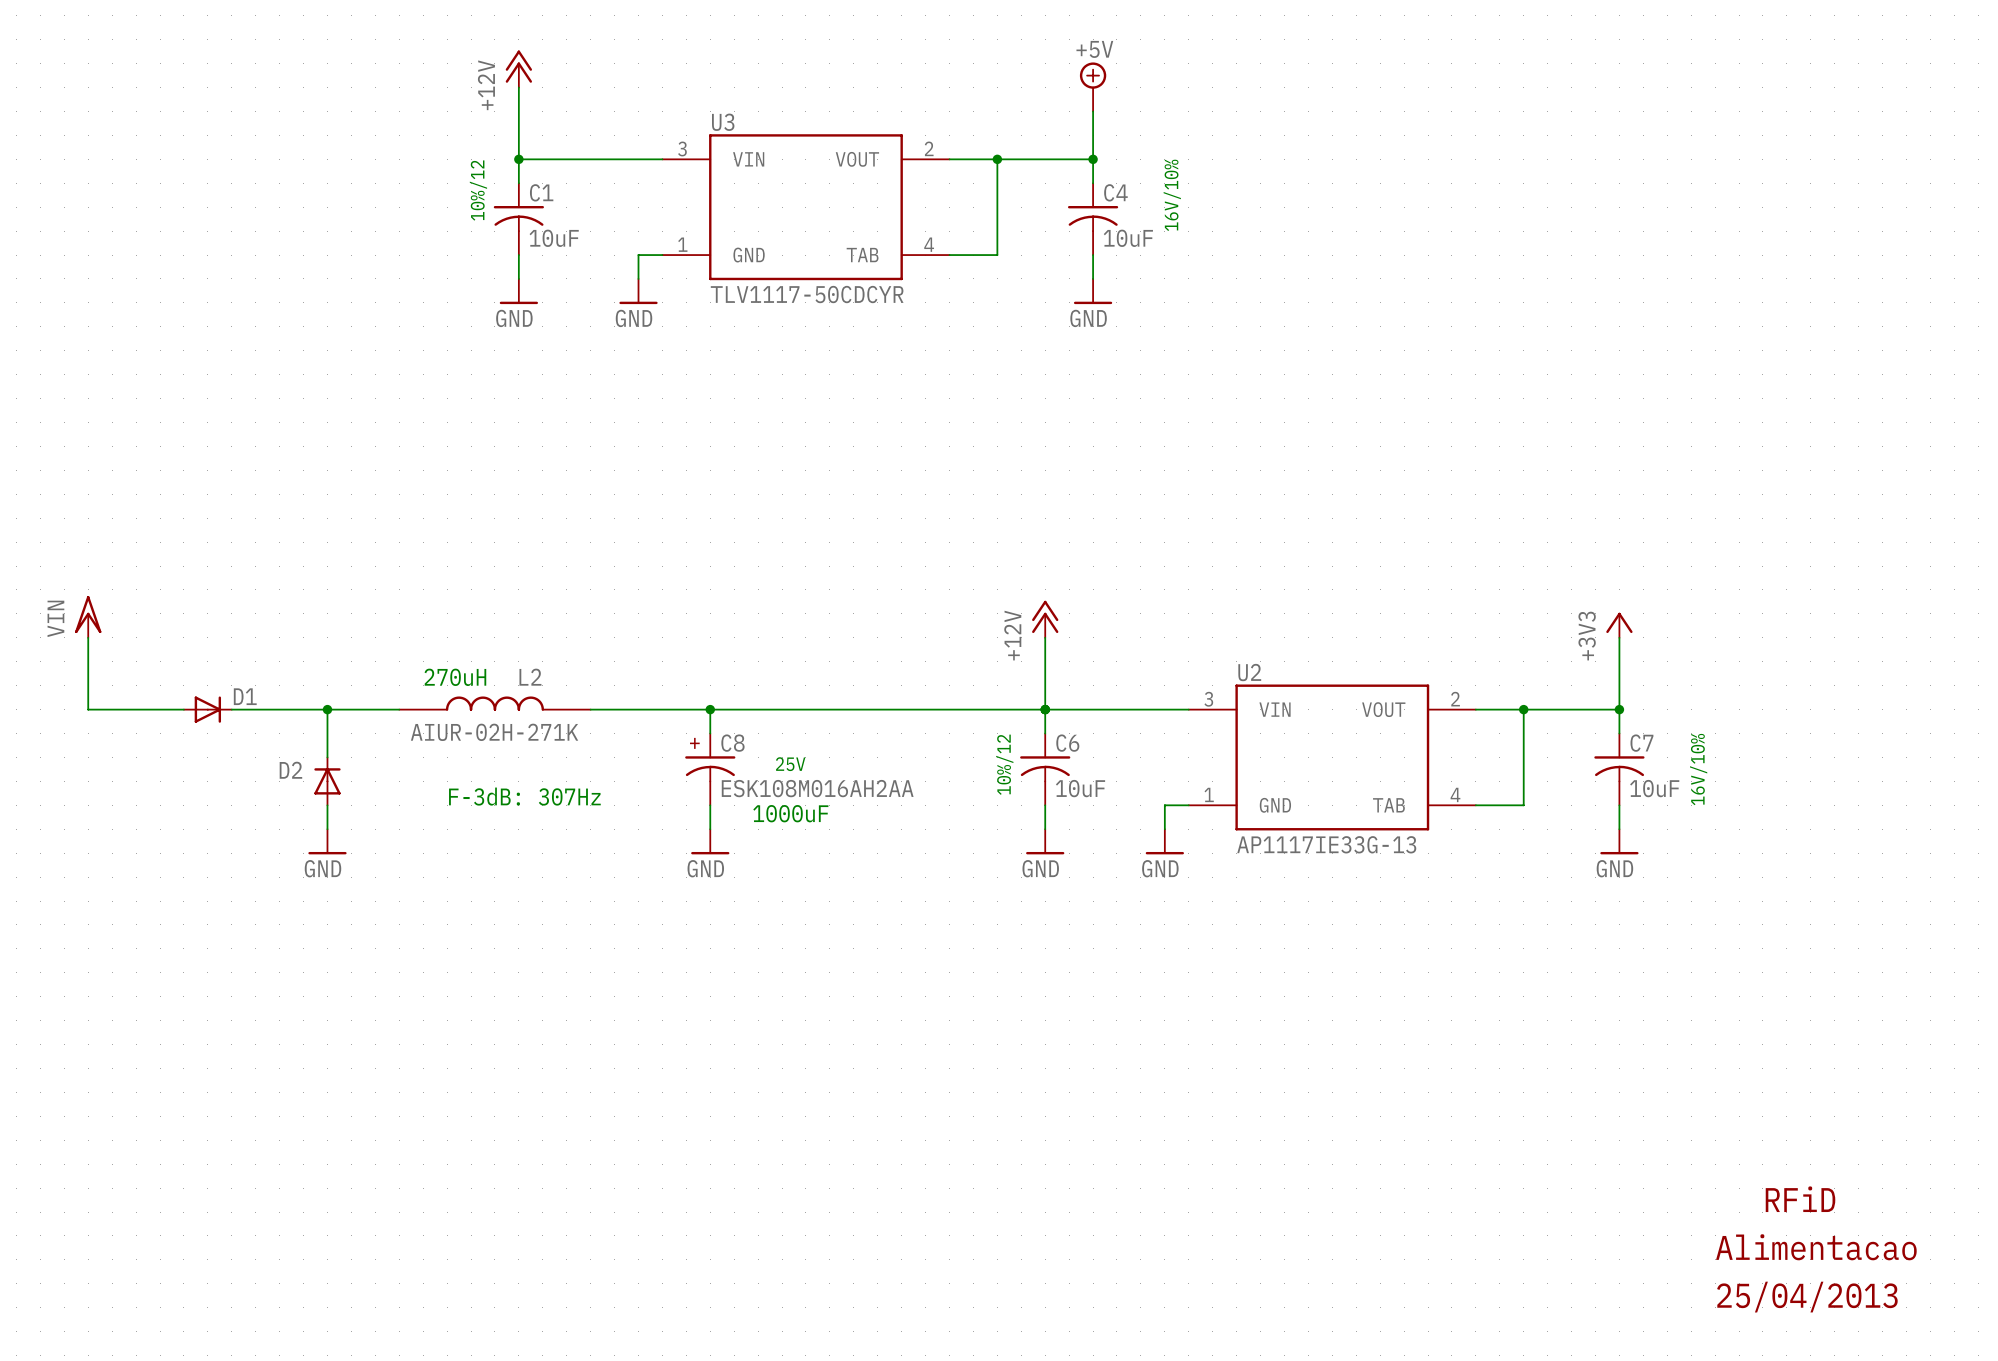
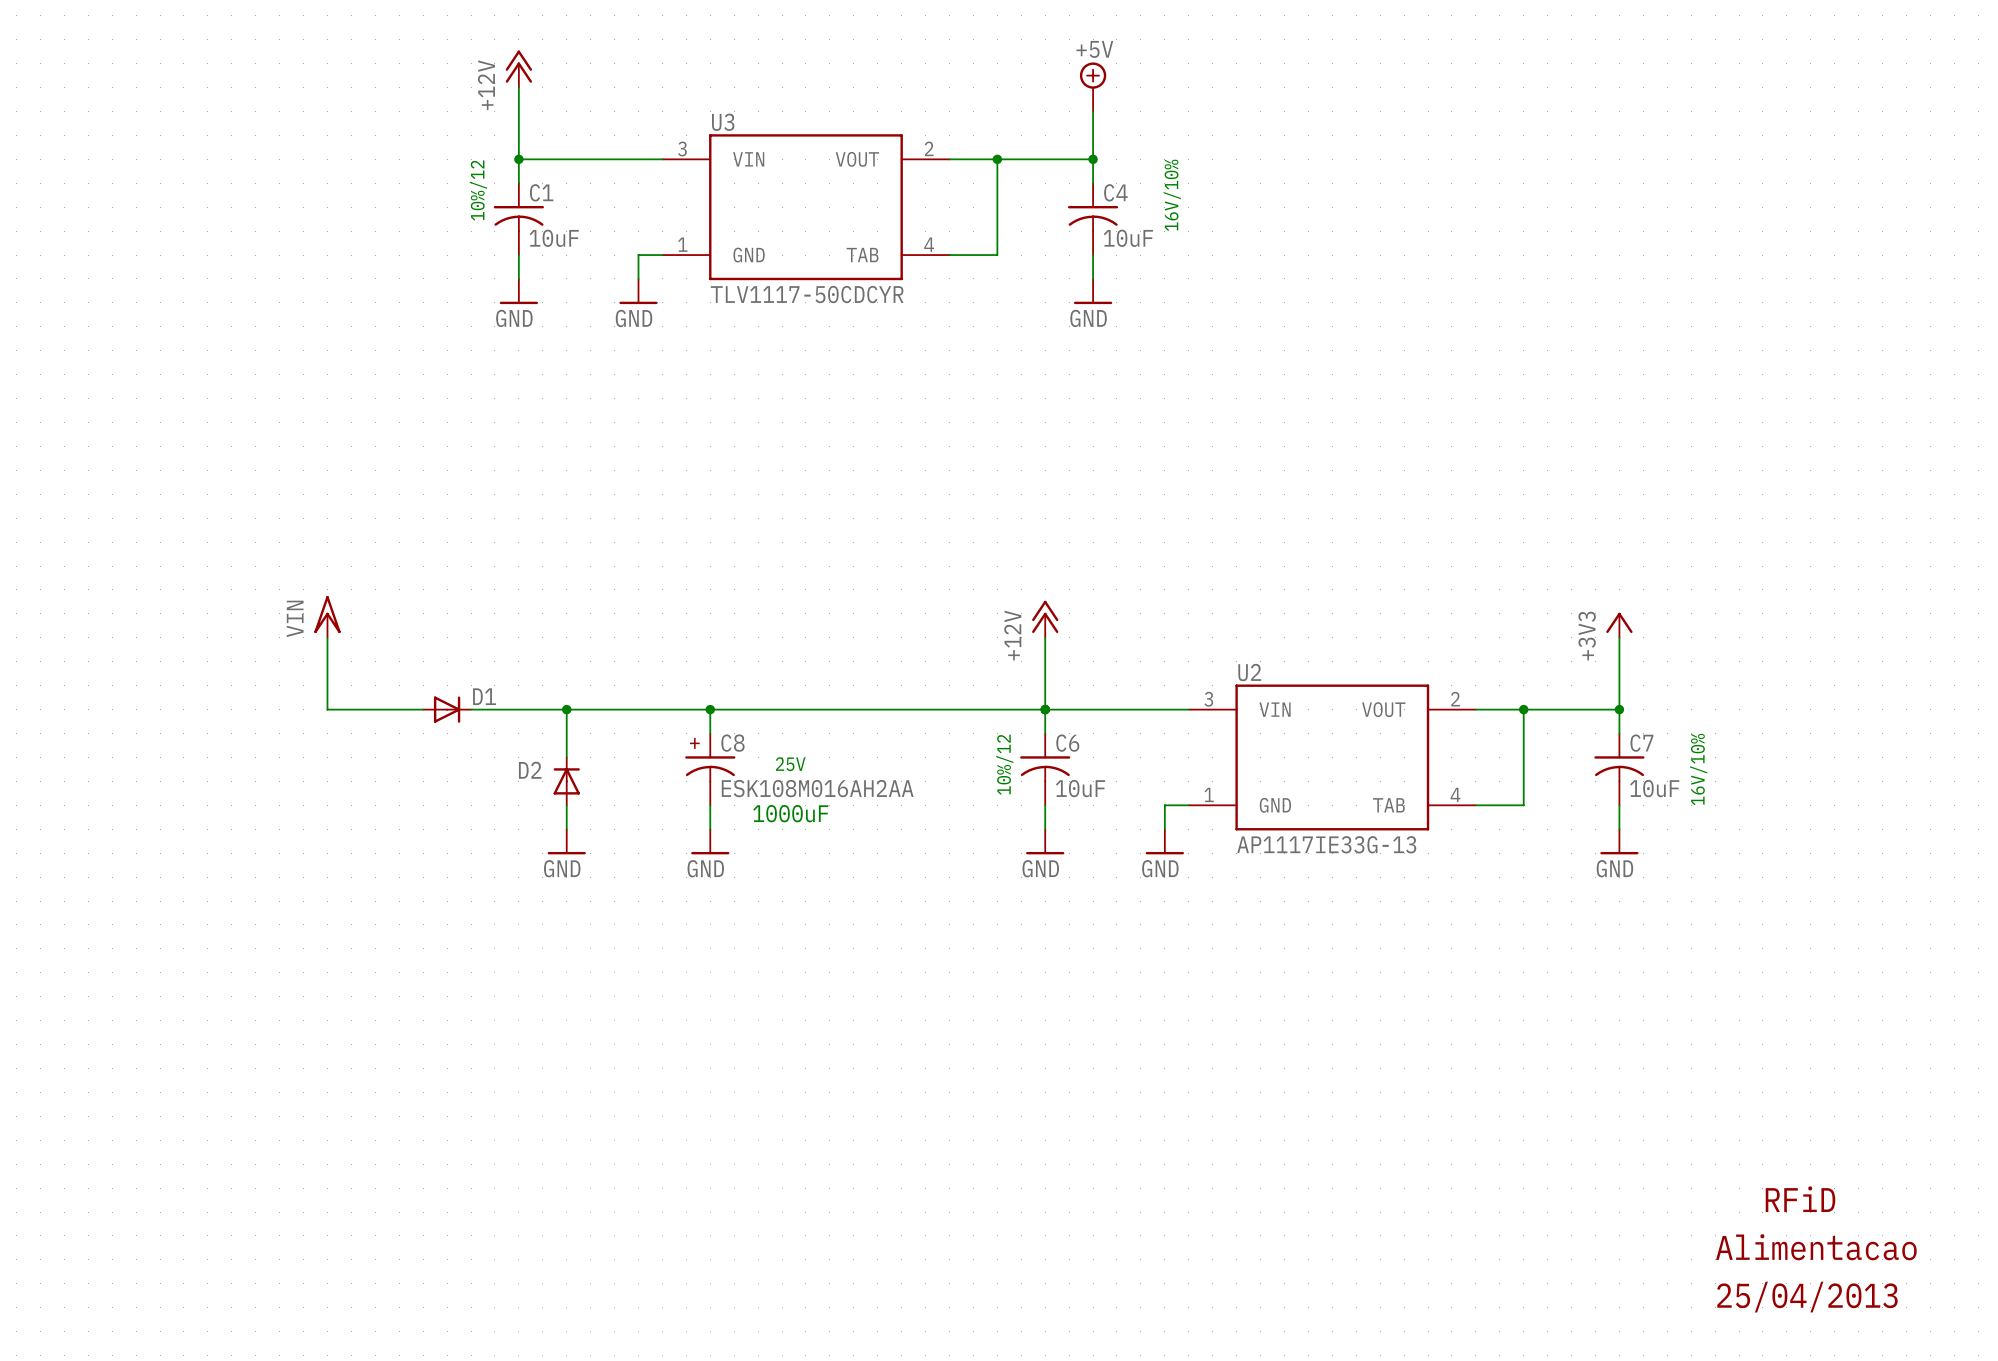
power symbol: VIN (88, 616) -> none
power symbol: none -> VIN (327, 616)
wire: (88, 637) (88, 709) (183, 709) -> none
wire: none -> (327, 637) (327, 709)
text: 270uH (455, 677) -> none
L2: AIUR-02H-271K (494, 703) -> none
D1 position: (207, 709) -> (447, 709)
wire: (231, 709) (327, 709) (327, 757) -> none
junction: (327, 709) -> none
wire: none -> (471, 709) (590, 709)
wire: none -> (566, 709) (566, 757)
junction: none -> (566, 709)
D2 position: (327, 781) -> (566, 781)
text: F-3dB: 307Hz (524, 796) -> none
wire: (327, 805) (327, 829) -> none
wire: none -> (566, 805) (566, 829)
power symbol: GND (327, 841) -> none
power symbol: none -> GND (566, 841)

